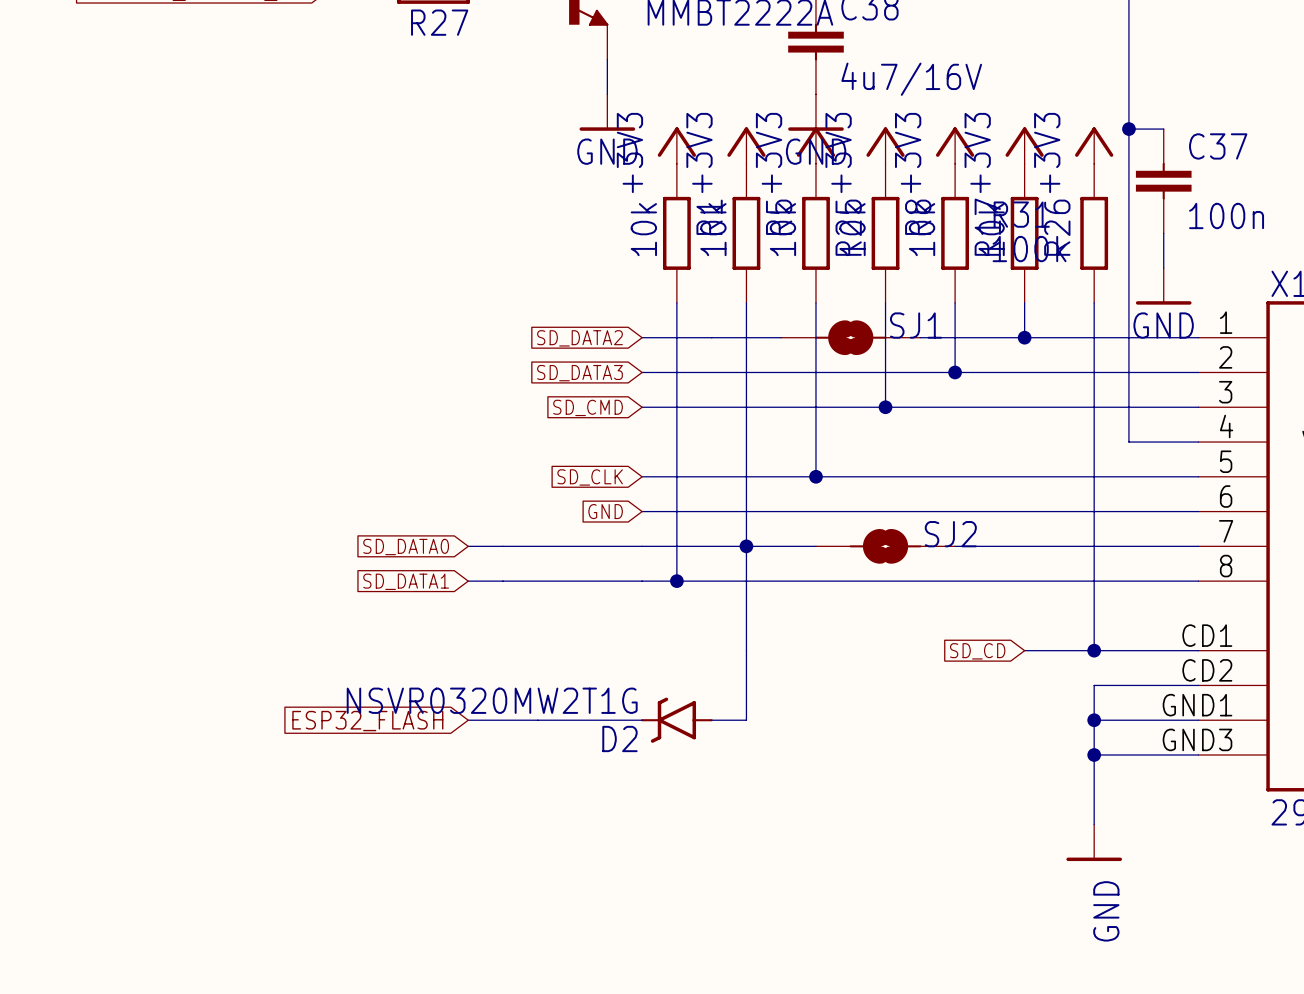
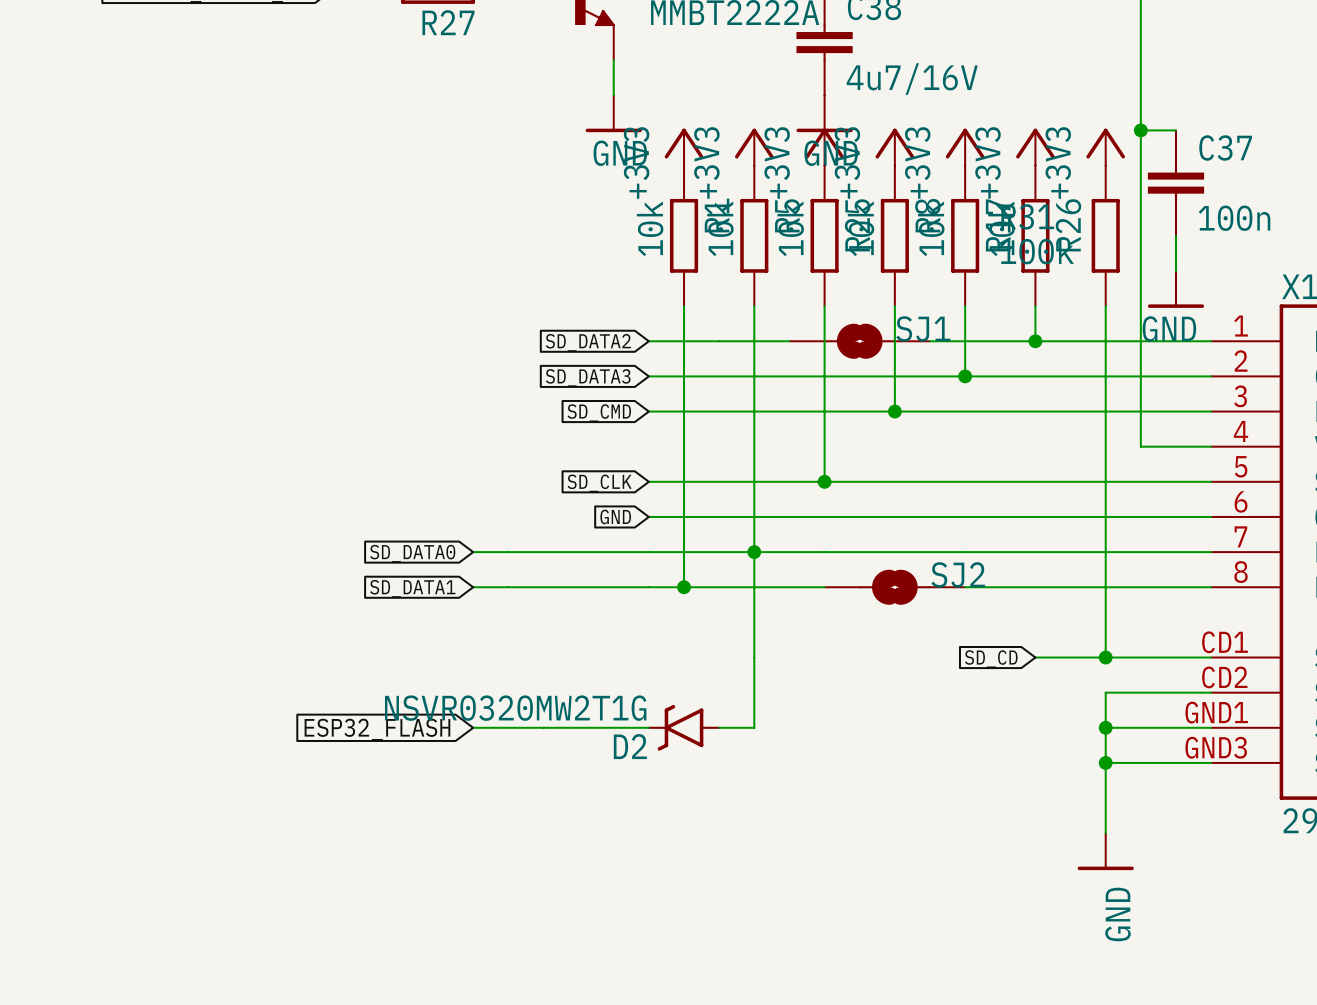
SJ2 position: (885, 546) -> (894, 587)

